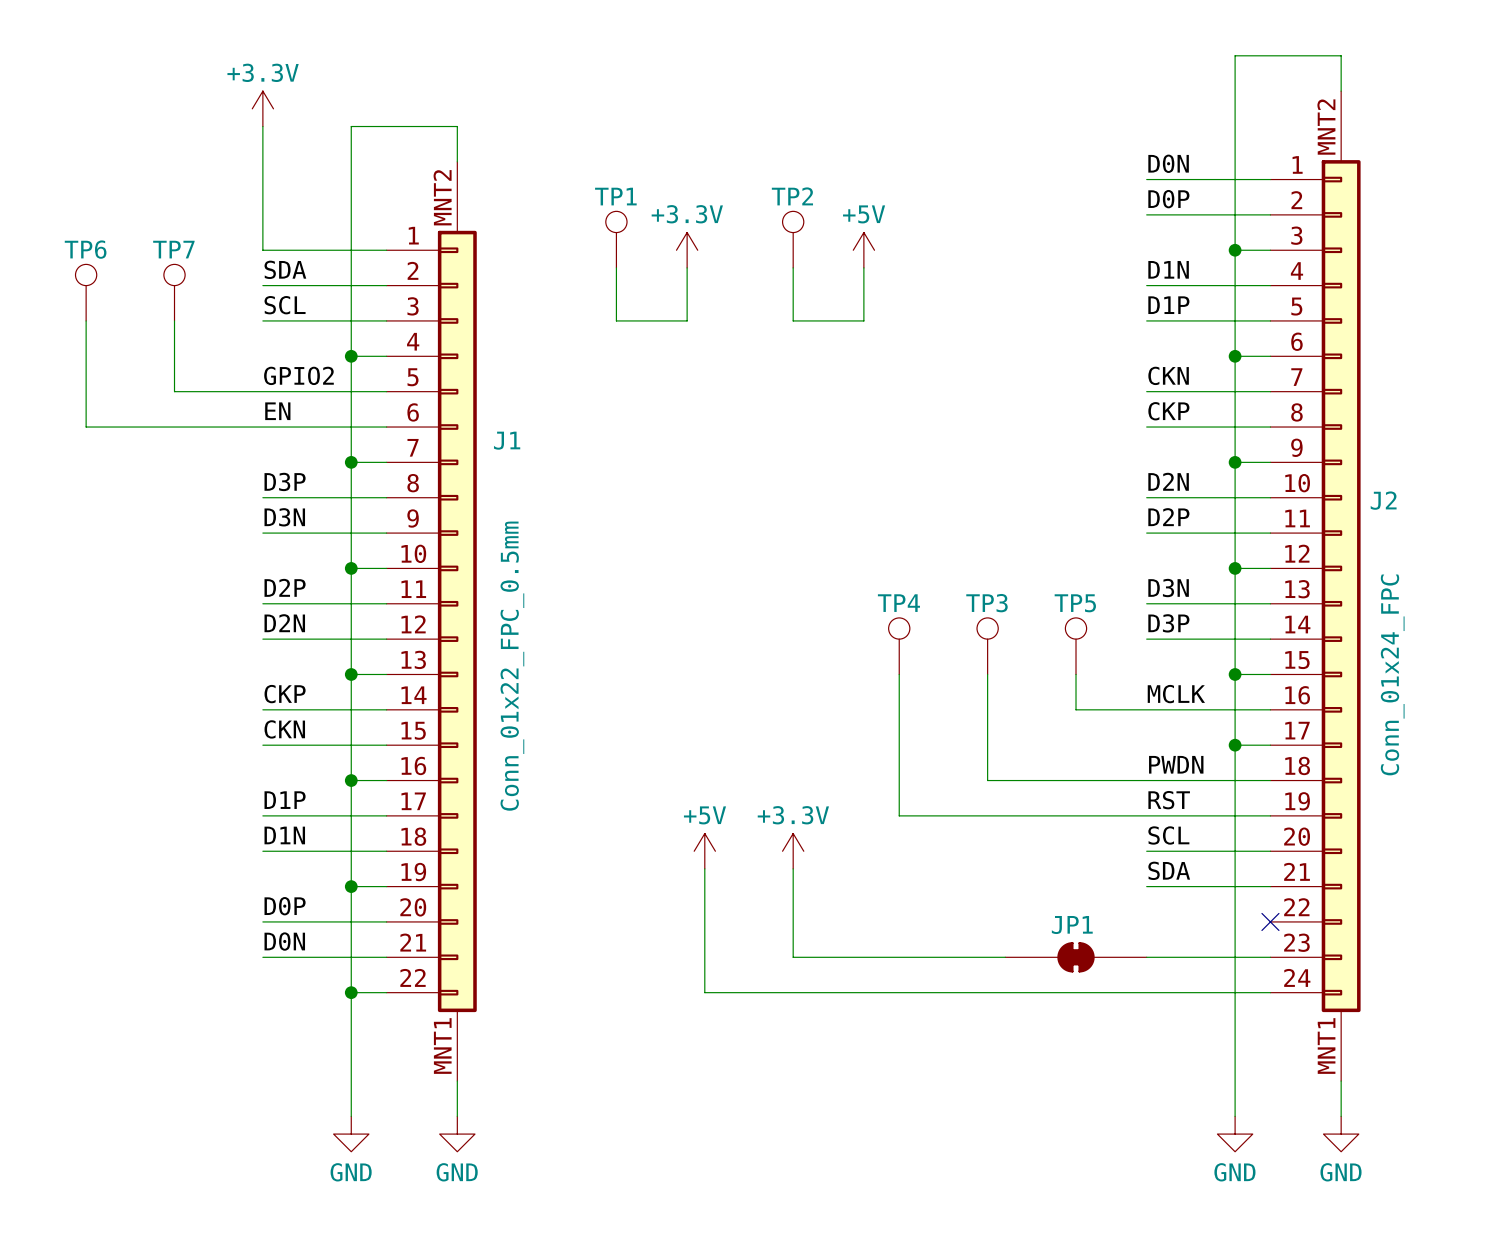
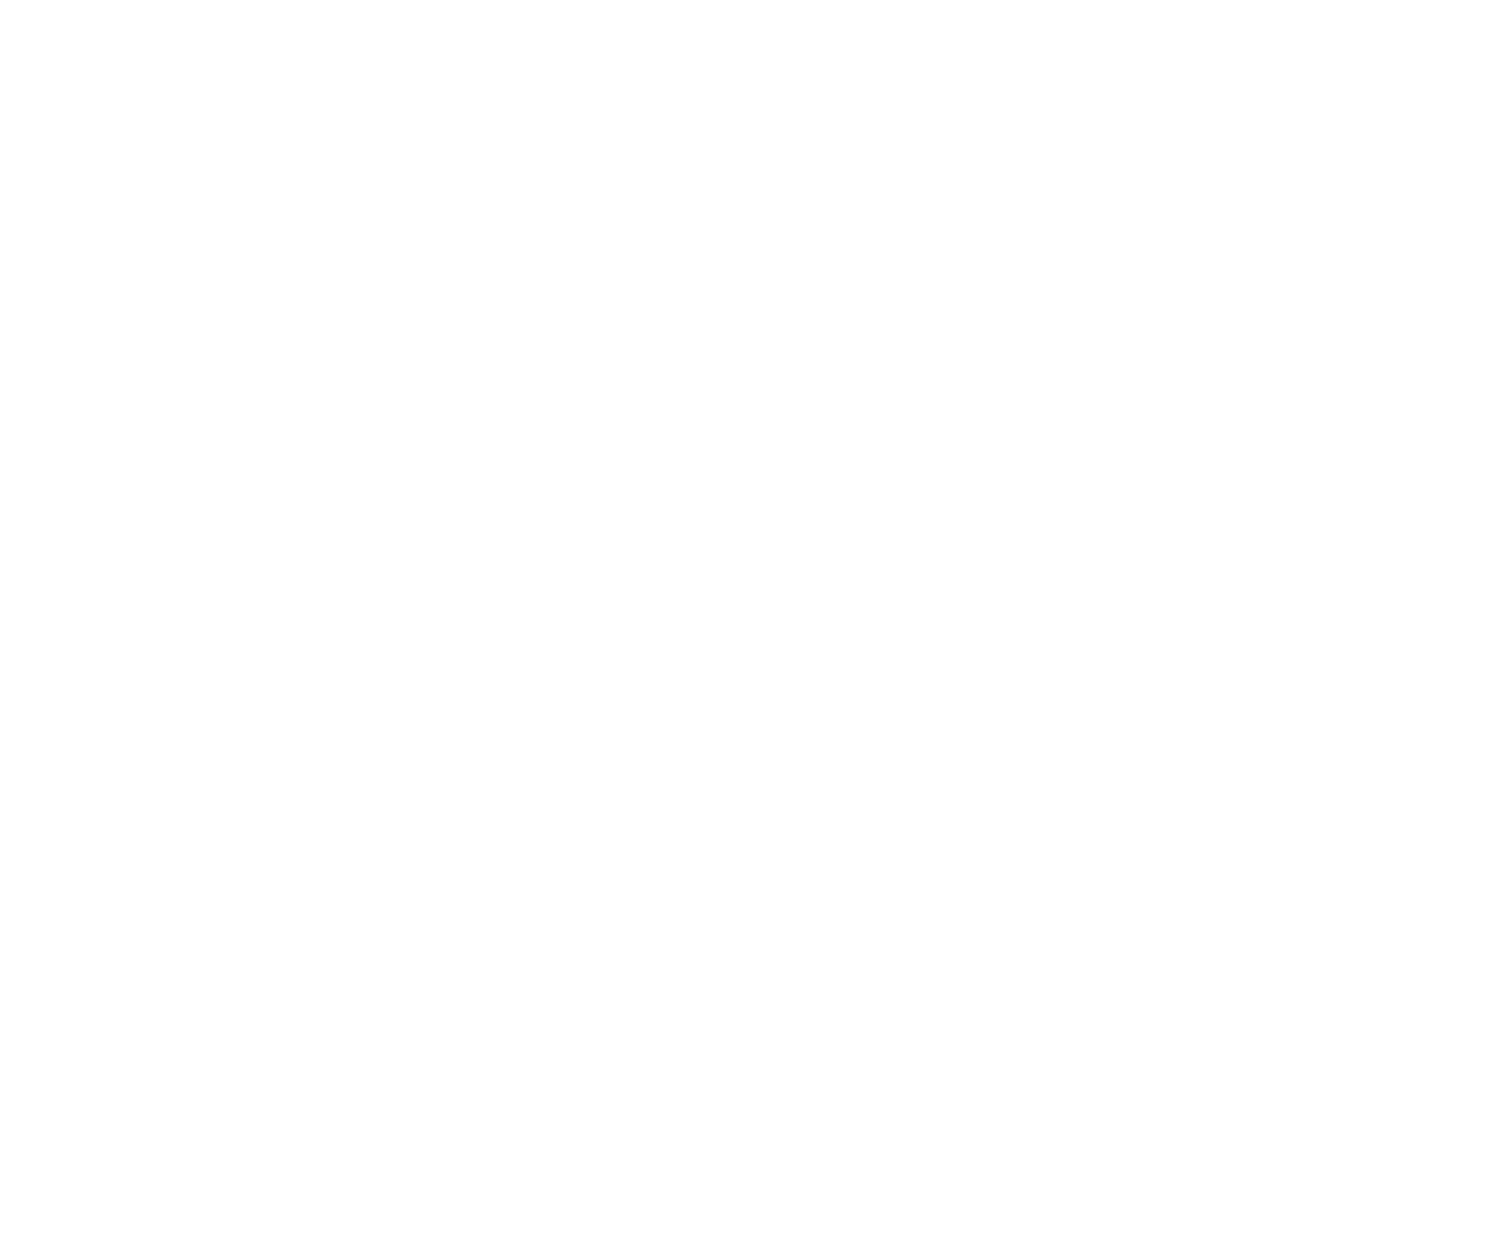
wire: (1341, 91) (1341, 55) (1235, 55) (1235, 1116) -> none
power symbol: +3.3V (262, 108) -> none
wire: (262, 126) (262, 250) (386, 250) -> none
wire: (457, 161) (457, 126) (351, 126) (351, 1116) -> none
label: D0N (1168, 163) -> none
wire: (1146, 179) (1270, 179) -> none
label: D0P (1168, 199) -> none
wire: (1146, 214) (1270, 214) -> none
TP1: (616, 239) -> none
TP2: (793, 239) -> none
power symbol: +3.3V (687, 250) -> none
power symbol: +5V (863, 250) -> none
wire: (1235, 250) (1270, 250) -> none
junction: (1235, 250) -> none
wire: (616, 267) (616, 320) (687, 320) (687, 267) -> none
wire: (793, 267) (793, 320) (863, 320) (863, 267) -> none
label: SDA (285, 269) -> none
label: D1N (1168, 269) -> none
wire: (262, 285) (386, 285) -> none
wire: (1146, 285) (1270, 285) -> none
TP6: (86, 292) -> none
TP7: (174, 292) -> none
label: SCL (285, 305) -> none
label: D1P (1168, 305) -> none
wire: (86, 320) (86, 427) (386, 427) -> none
wire: (174, 320) (174, 391) (386, 391) -> none
wire: (262, 320) (386, 320) -> none
wire: (1146, 320) (1270, 320) -> none
wire: (351, 356) (386, 356) -> none
junction: (351, 356) -> none
wire: (1235, 356) (1270, 356) -> none
junction: (1235, 356) -> none
label: GPIO2 (298, 375) -> none
label: CKN (1168, 375) -> none
wire: (1146, 391) (1270, 391) -> none
label: EN (277, 411) -> none
label: CKP (1168, 411) -> none
wire: (1146, 427) (1270, 427) -> none
wire: (351, 462) (386, 462) -> none
junction: (351, 462) -> none
wire: (1235, 462) (1270, 462) -> none
junction: (1235, 462) -> none
label: D3P (285, 481) -> none
label: D2N (1168, 481) -> none
wire: (262, 497) (386, 497) -> none
wire: (1146, 497) (1270, 497) -> none
label: D3N (284, 517) -> none
label: D2P (1168, 517) -> none
wire: (262, 533) (386, 533) -> none
wire: (1146, 533) (1270, 533) -> none
wire: (351, 568) (386, 568) -> none
junction: (351, 568) -> none
wire: (1235, 568) (1270, 568) -> none
junction: (1235, 568) -> none
J2: Conn_01x24_FPC (1315, 586) -> none
label: D2P (285, 587) -> none
label: D3N (1168, 588) -> none
wire: (262, 603) (386, 603) -> none
wire: (1146, 603) (1270, 603) -> none
J1: Conn_01x22_FPC_0.5mm (431, 621) -> none
label: D2N (284, 623) -> none
label: D3P (1168, 623) -> none
wire: (262, 639) (386, 639) -> none
wire: (1146, 639) (1270, 639) -> none
TP4: (899, 646) -> none
TP3: (987, 646) -> none
TP5: (1076, 646) -> none
wire: (351, 674) (386, 674) -> none
junction: (351, 674) -> none
wire: (899, 674) (899, 815) (1270, 815) -> none
wire: (987, 674) (987, 780) (1270, 780) -> none
wire: (1076, 674) (1076, 709) (1270, 709) -> none
wire: (1235, 674) (1270, 674) -> none
junction: (1235, 674) -> none
label: CKP (285, 694) -> none
label: MCLK (1176, 694) -> none
wire: (262, 709) (386, 709) -> none
label: CKN (284, 729) -> none
wire: (262, 745) (386, 745) -> none
wire: (1235, 745) (1270, 745) -> none
junction: (1235, 745) -> none
label: PWDN (1176, 764) -> none
wire: (351, 780) (386, 780) -> none
junction: (351, 780) -> none
label: D1P (285, 800) -> none
label: RST (1169, 800) -> none
wire: (262, 815) (386, 815) -> none
label: D1N (284, 835) -> none
label: SCL (1168, 835) -> none
wire: (262, 851) (386, 851) -> none
power symbol: +5V (704, 851) -> none
power symbol: +3.3V (793, 851) -> none
wire: (1146, 851) (1270, 851) -> none
wire: (704, 868) (704, 992) (1270, 992) -> none
wire: (793, 868) (793, 957) (1005, 957) -> none
label: SDA (1169, 870) -> none
wire: (351, 886) (386, 886) -> none
junction: (351, 886) -> none
wire: (1146, 886) (1270, 886) -> none
label: D0P (285, 906) -> none
wire: (262, 921) (386, 921) -> none
no-connect mark: (1270, 921) -> none
label: D0N (284, 941) -> none
wire: (262, 957) (386, 957) -> none
JP1: (1076, 957) -> none
wire: (1146, 957) (1270, 957) -> none
wire: (351, 992) (386, 992) -> none
junction: (351, 992) -> none
wire: (457, 1081) (457, 1116) -> none
wire: (1341, 1081) (1341, 1116) -> none
power symbol: GND (351, 1134) -> none
power symbol: GND (457, 1134) -> none
power symbol: GND (1235, 1134) -> none
power symbol: GND (1341, 1134) -> none

